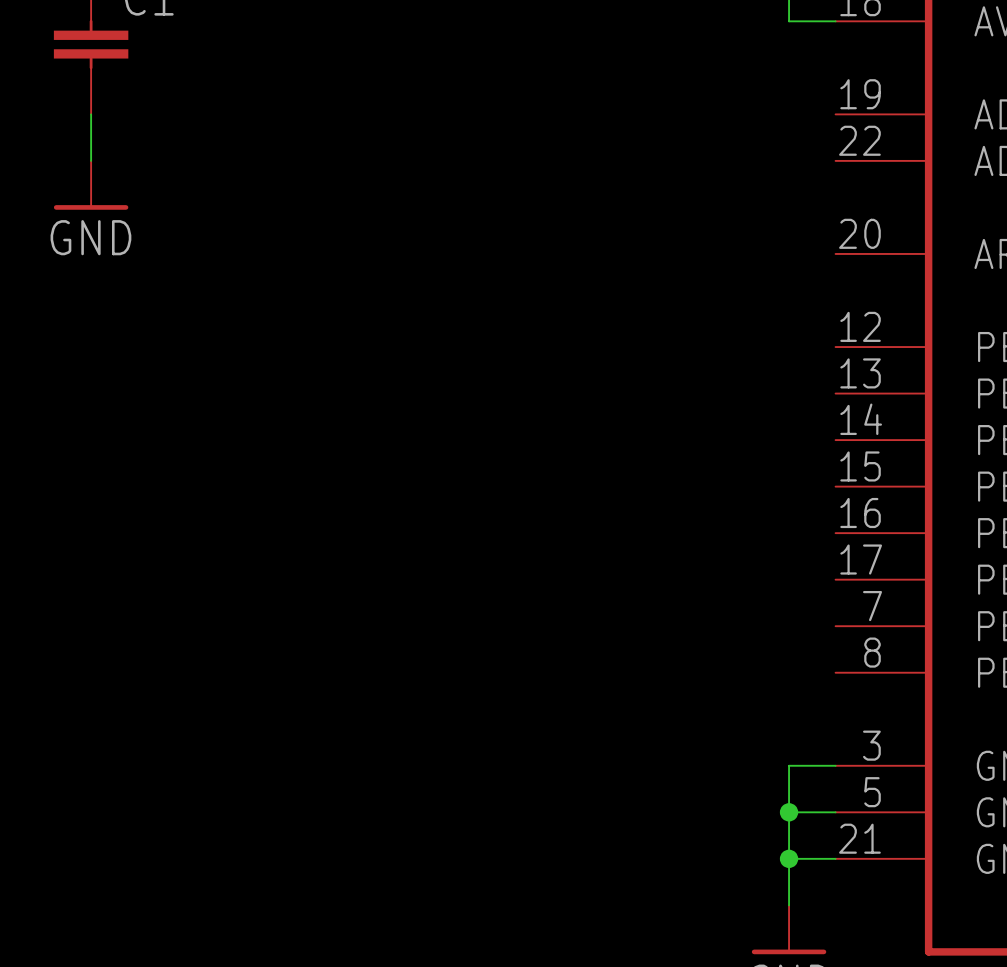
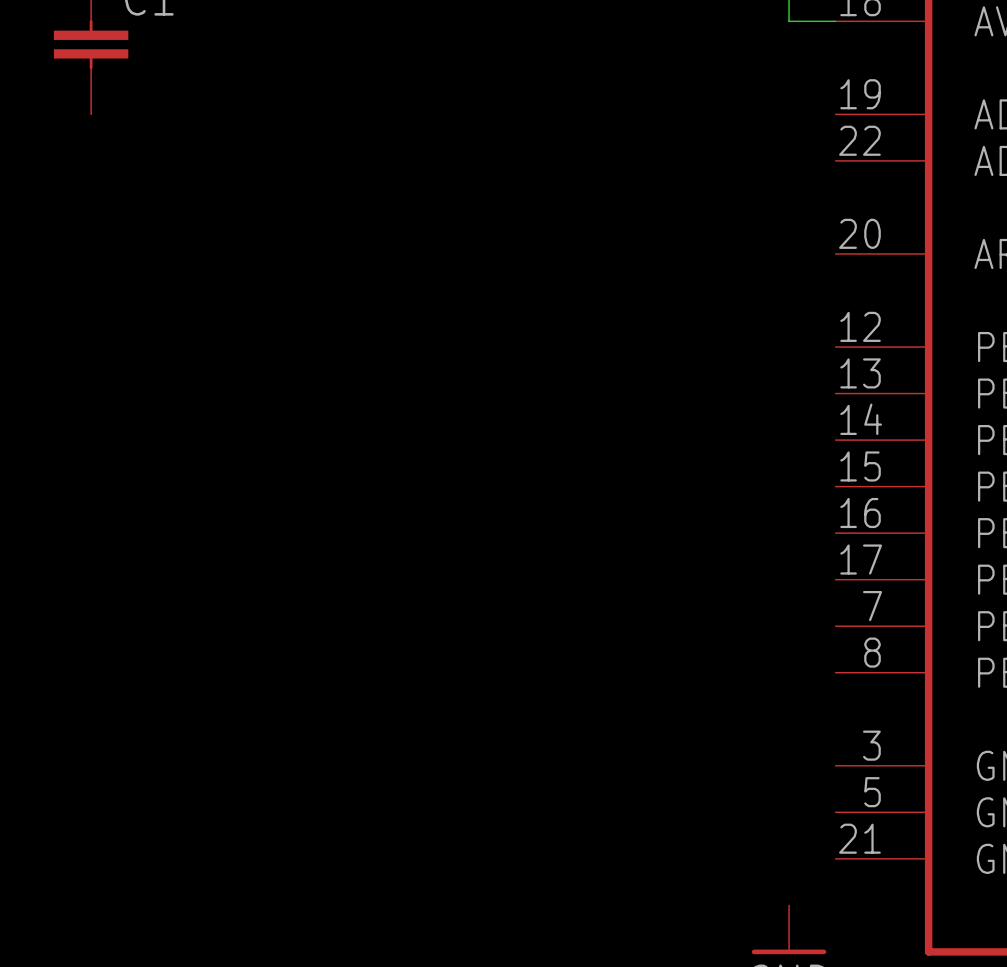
wire: (91, 114) (91, 160) -> none
power symbol: GND (91, 185) -> none
wire: (835, 765) (789, 765) (789, 905) -> none
wire: (789, 812) (835, 812) -> none
junction: (789, 812) -> none
wire: (789, 858) (835, 858) -> none
junction: (789, 858) -> none

